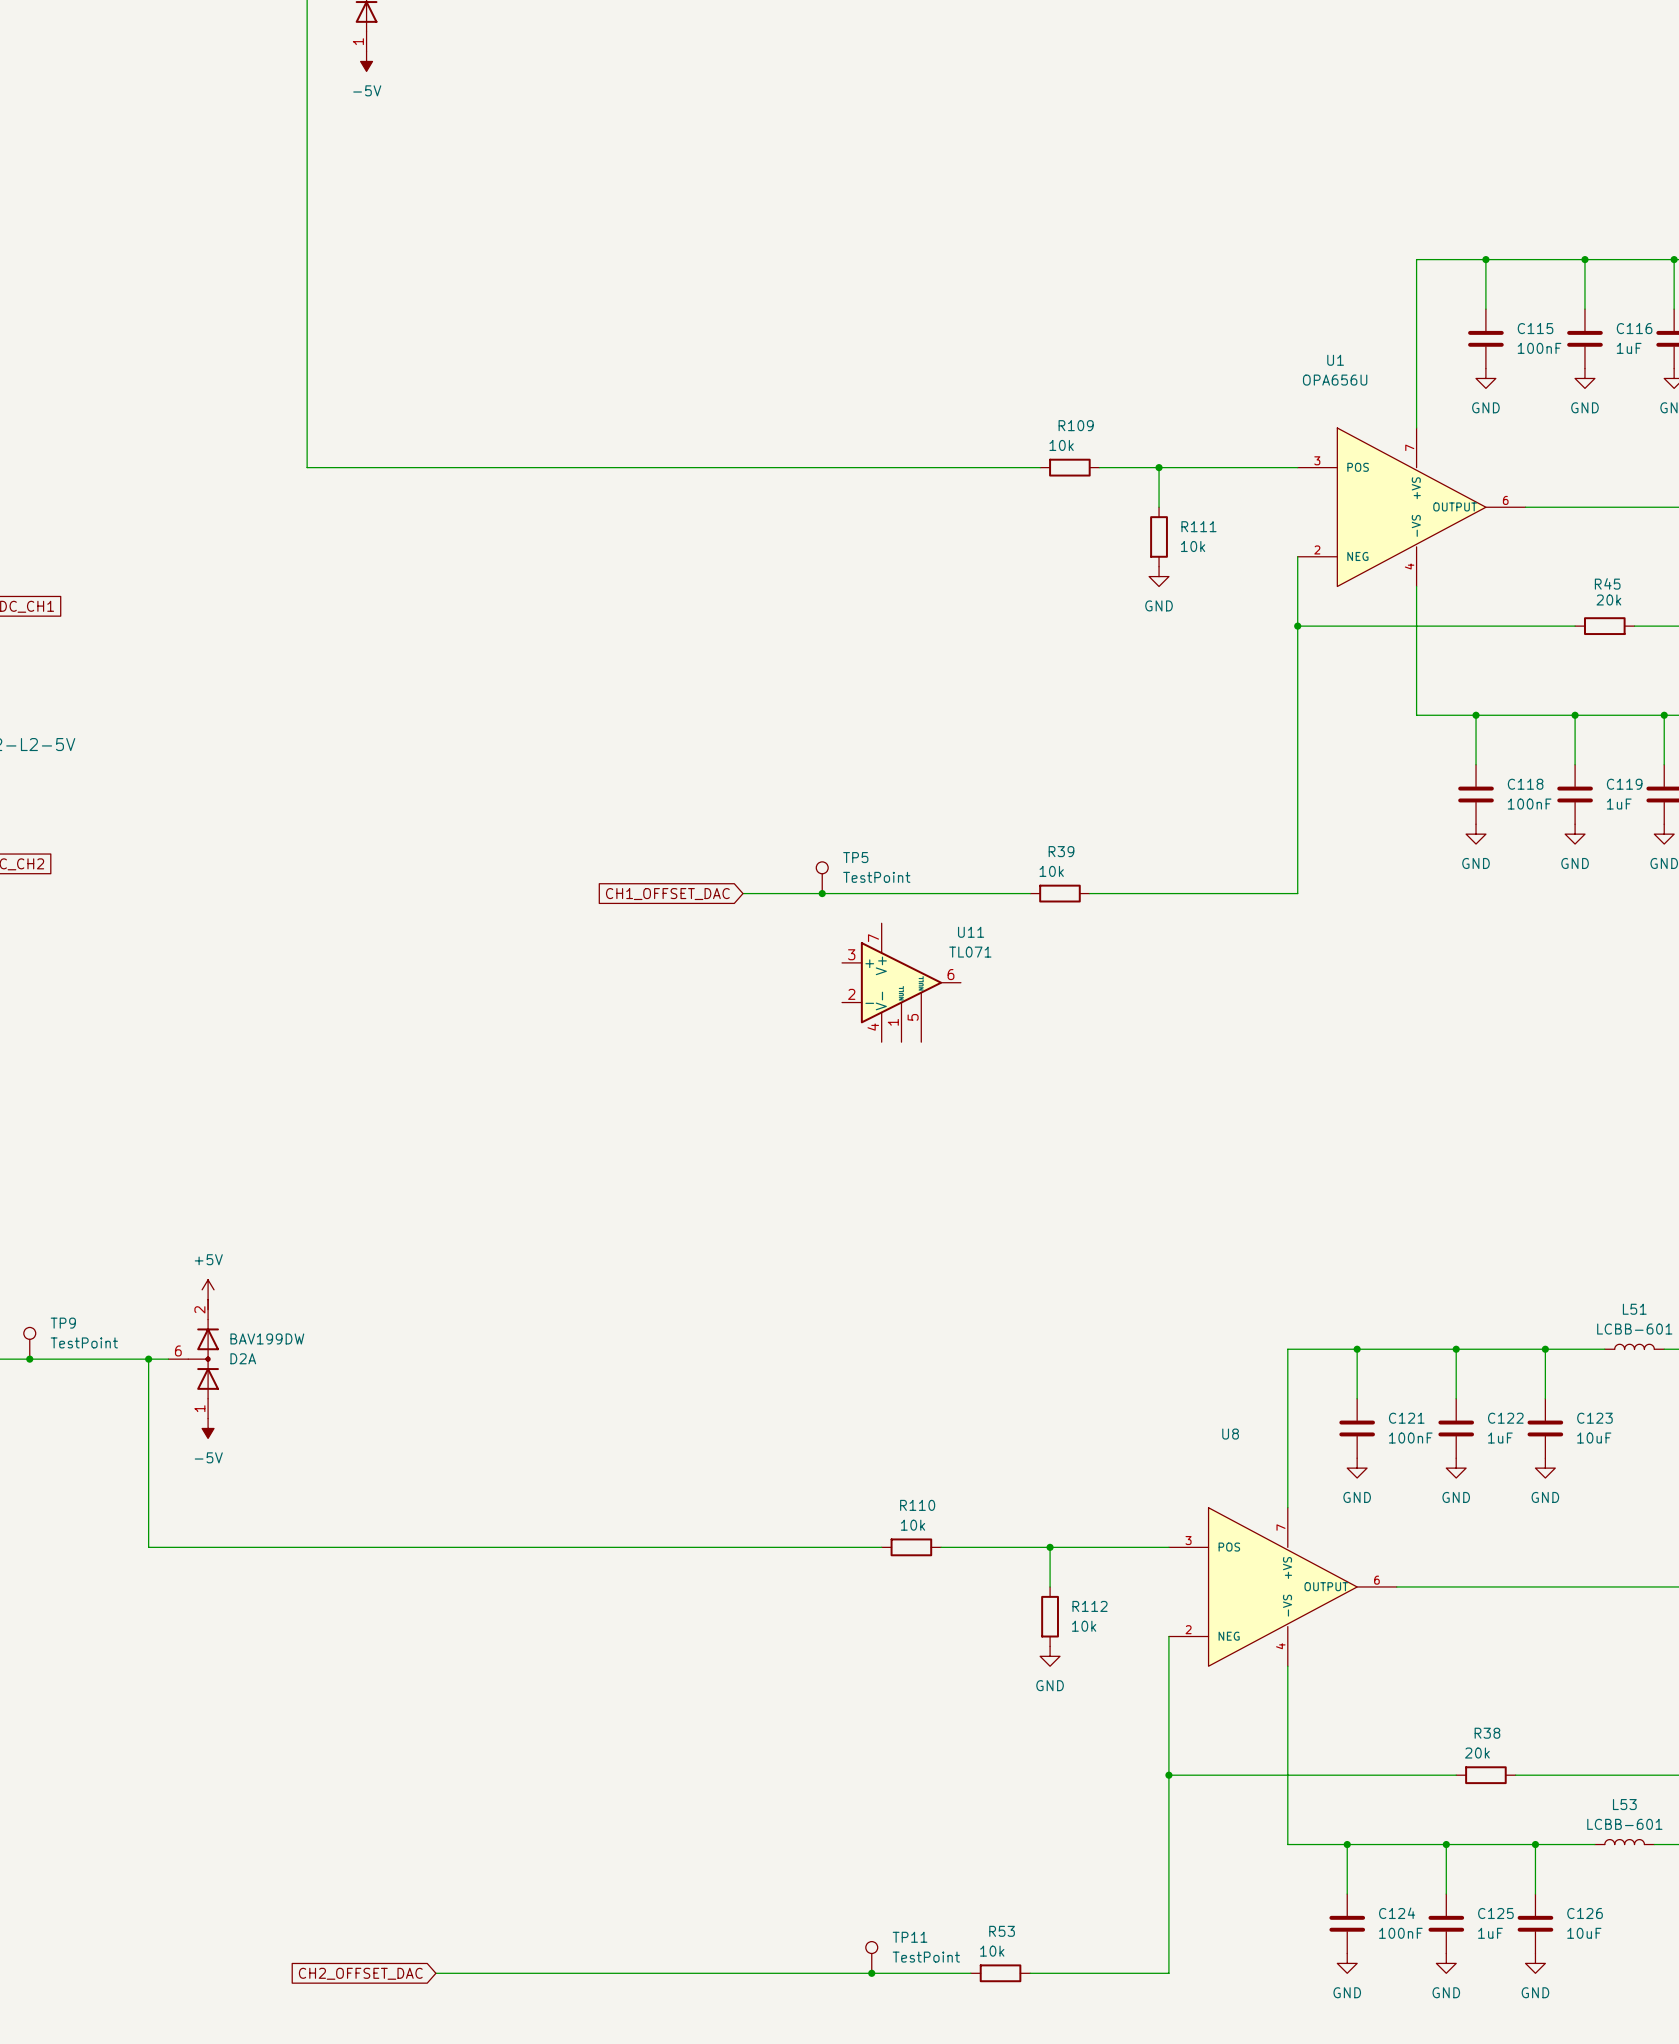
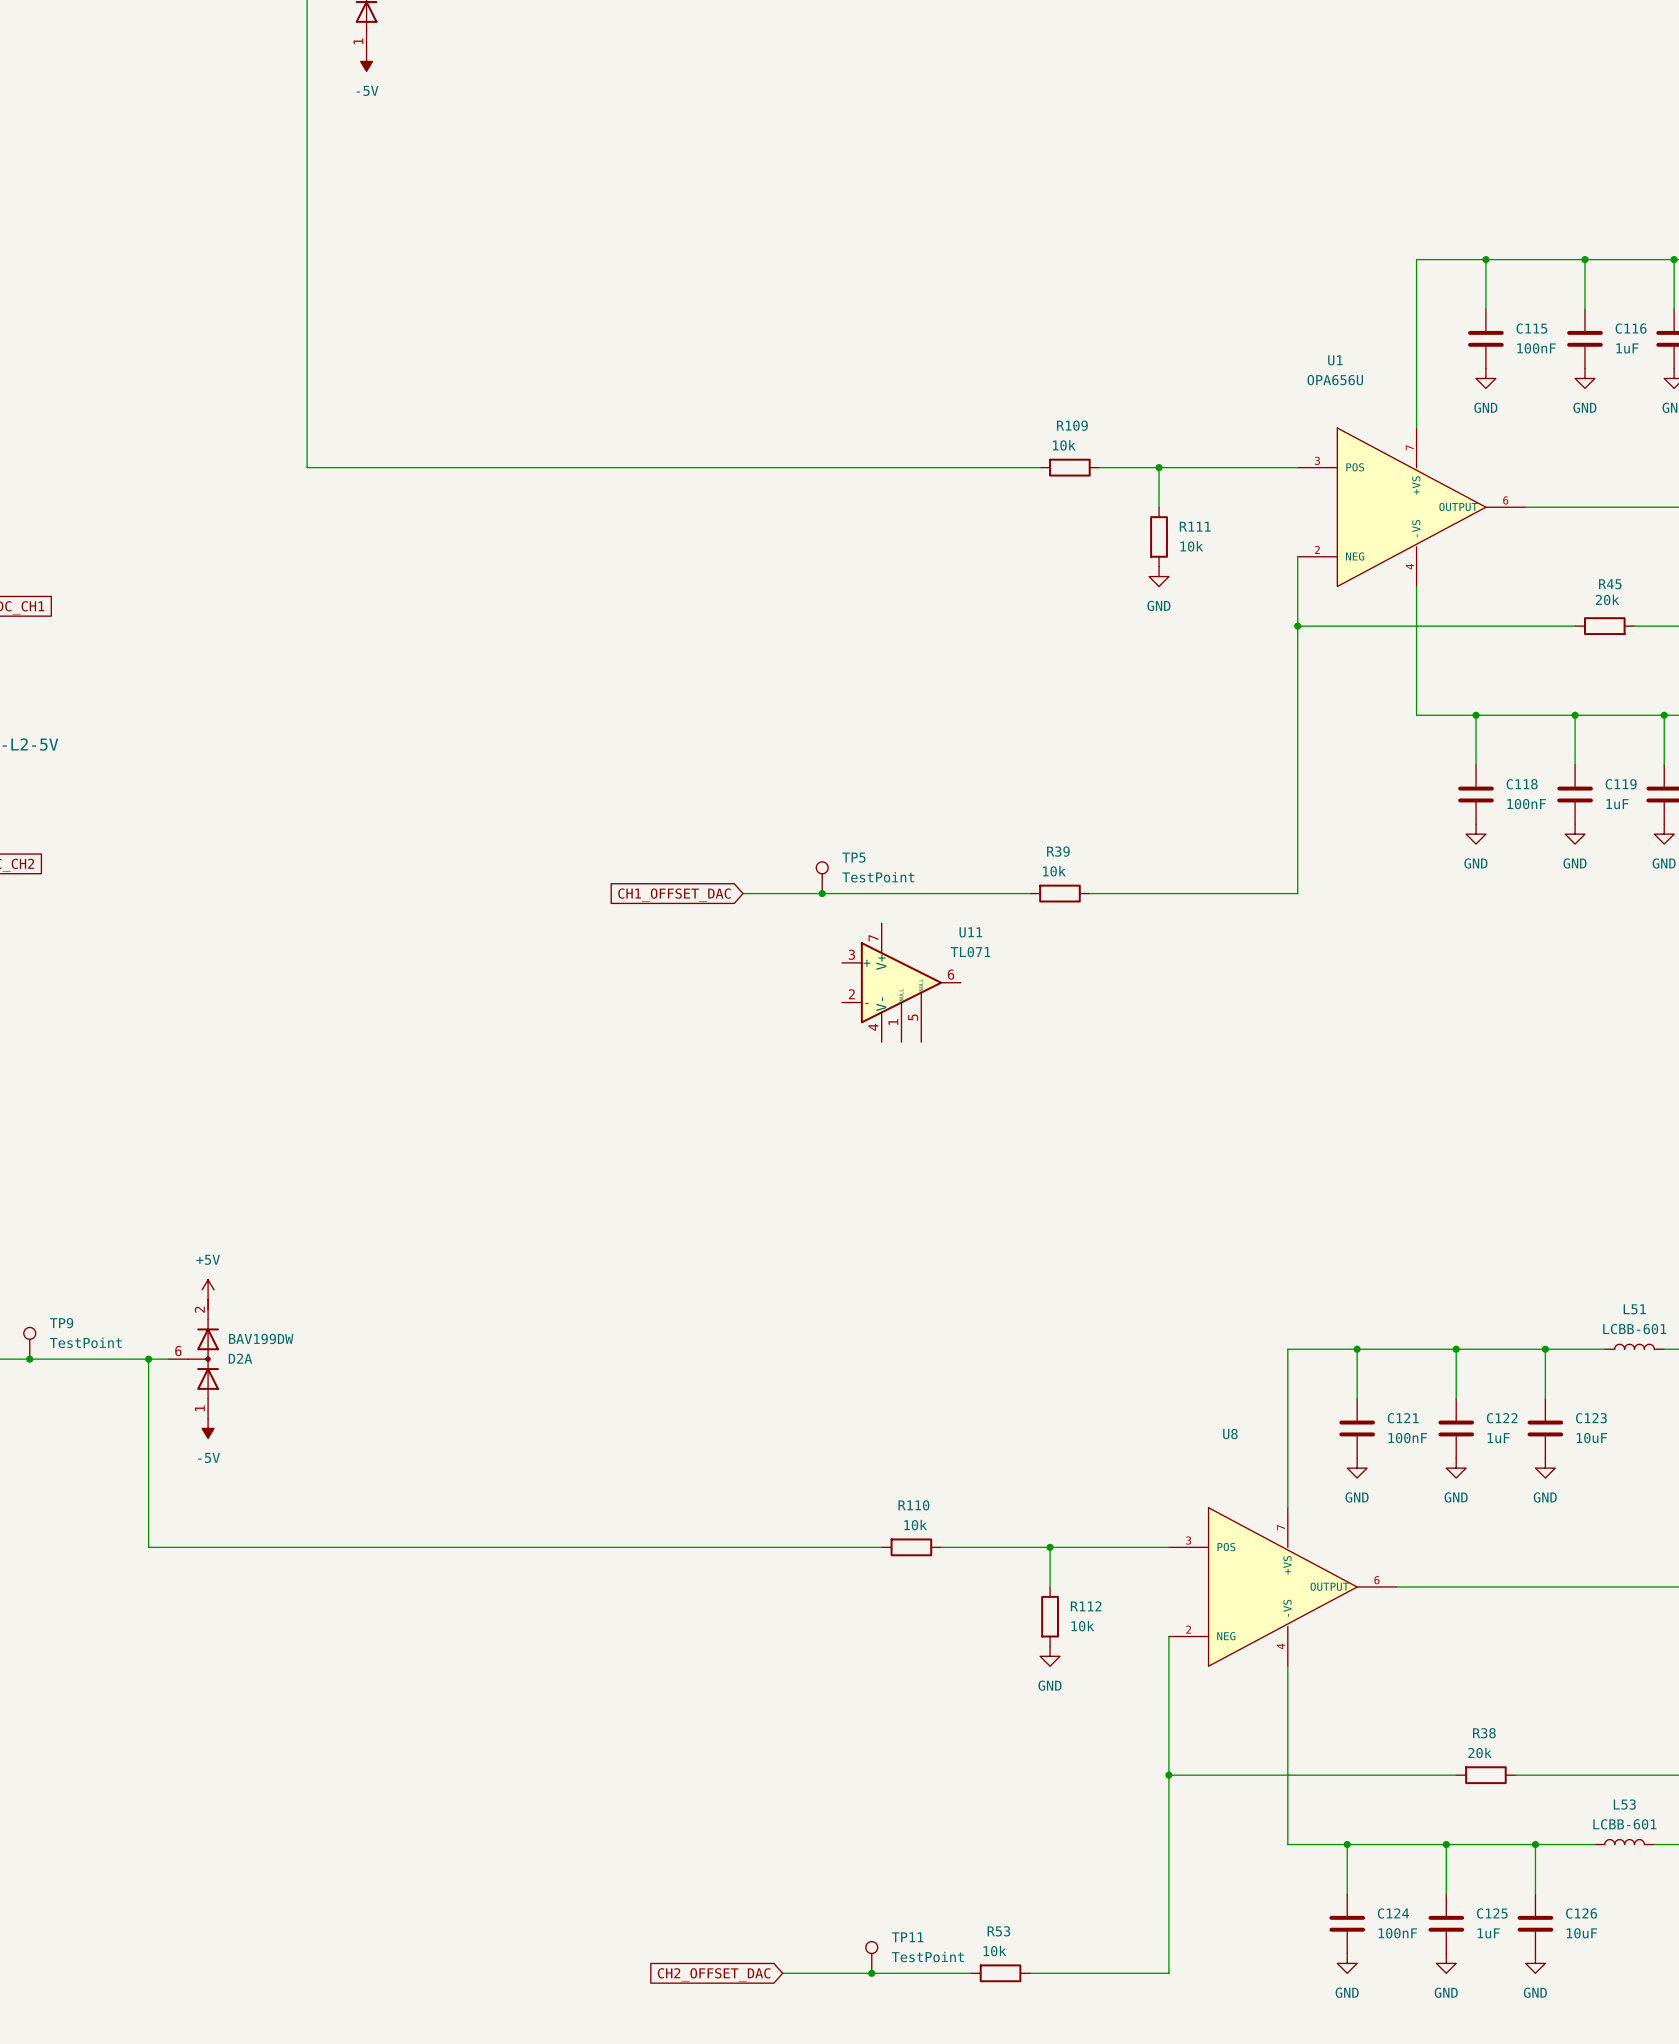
global label: CH2_OFFSET_DAC (360, 1973) -> none
wire: (435, 1973) (782, 1973) -> none
global label: none -> CH2_OFFSET_DAC (714, 1974)

